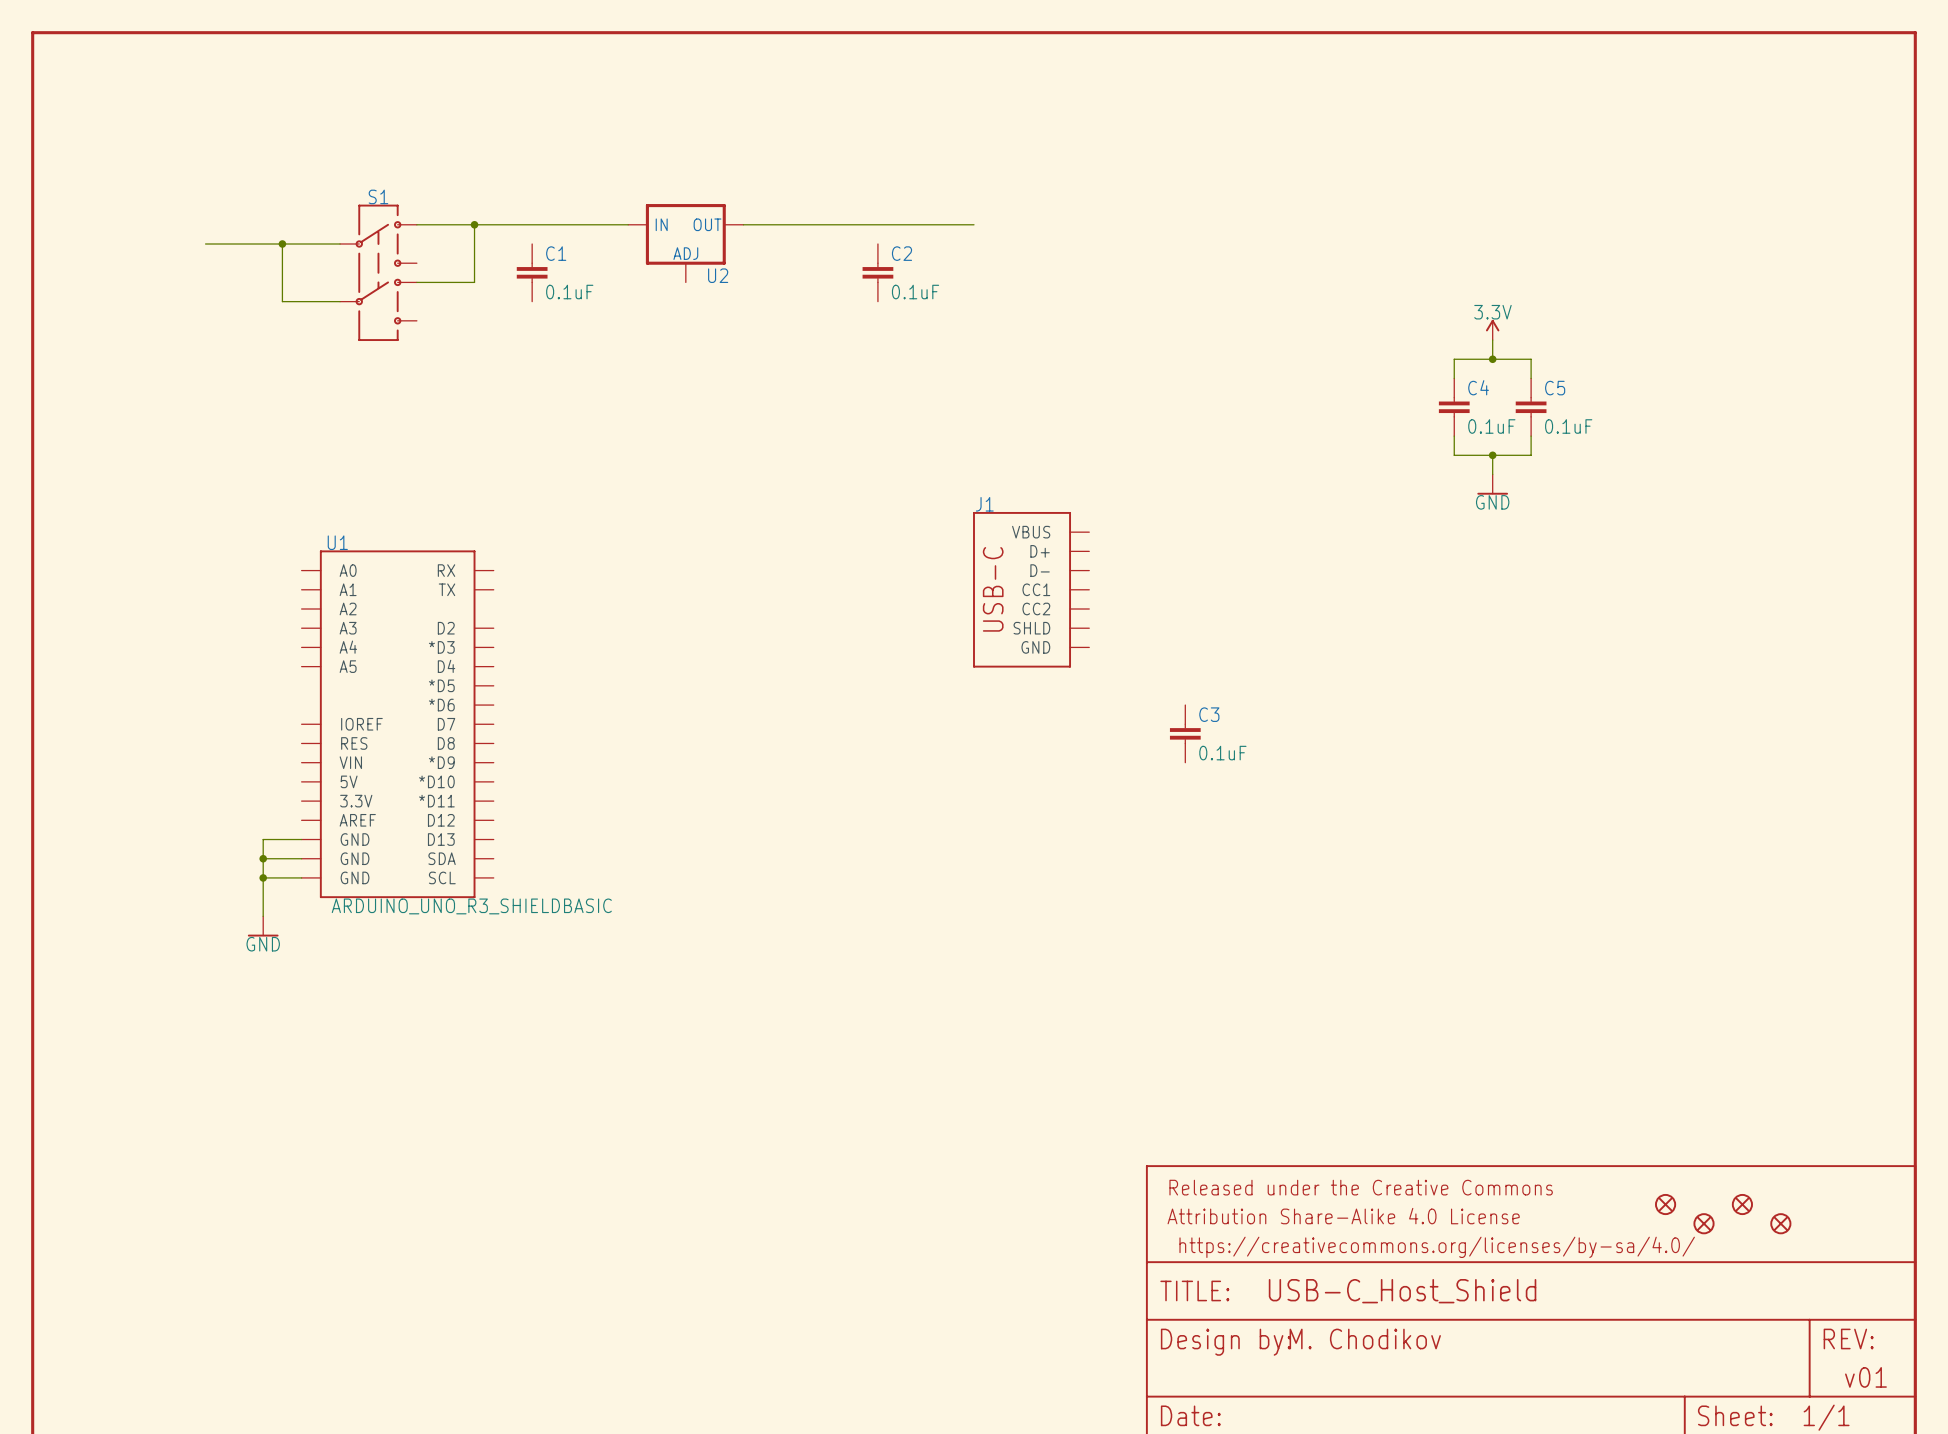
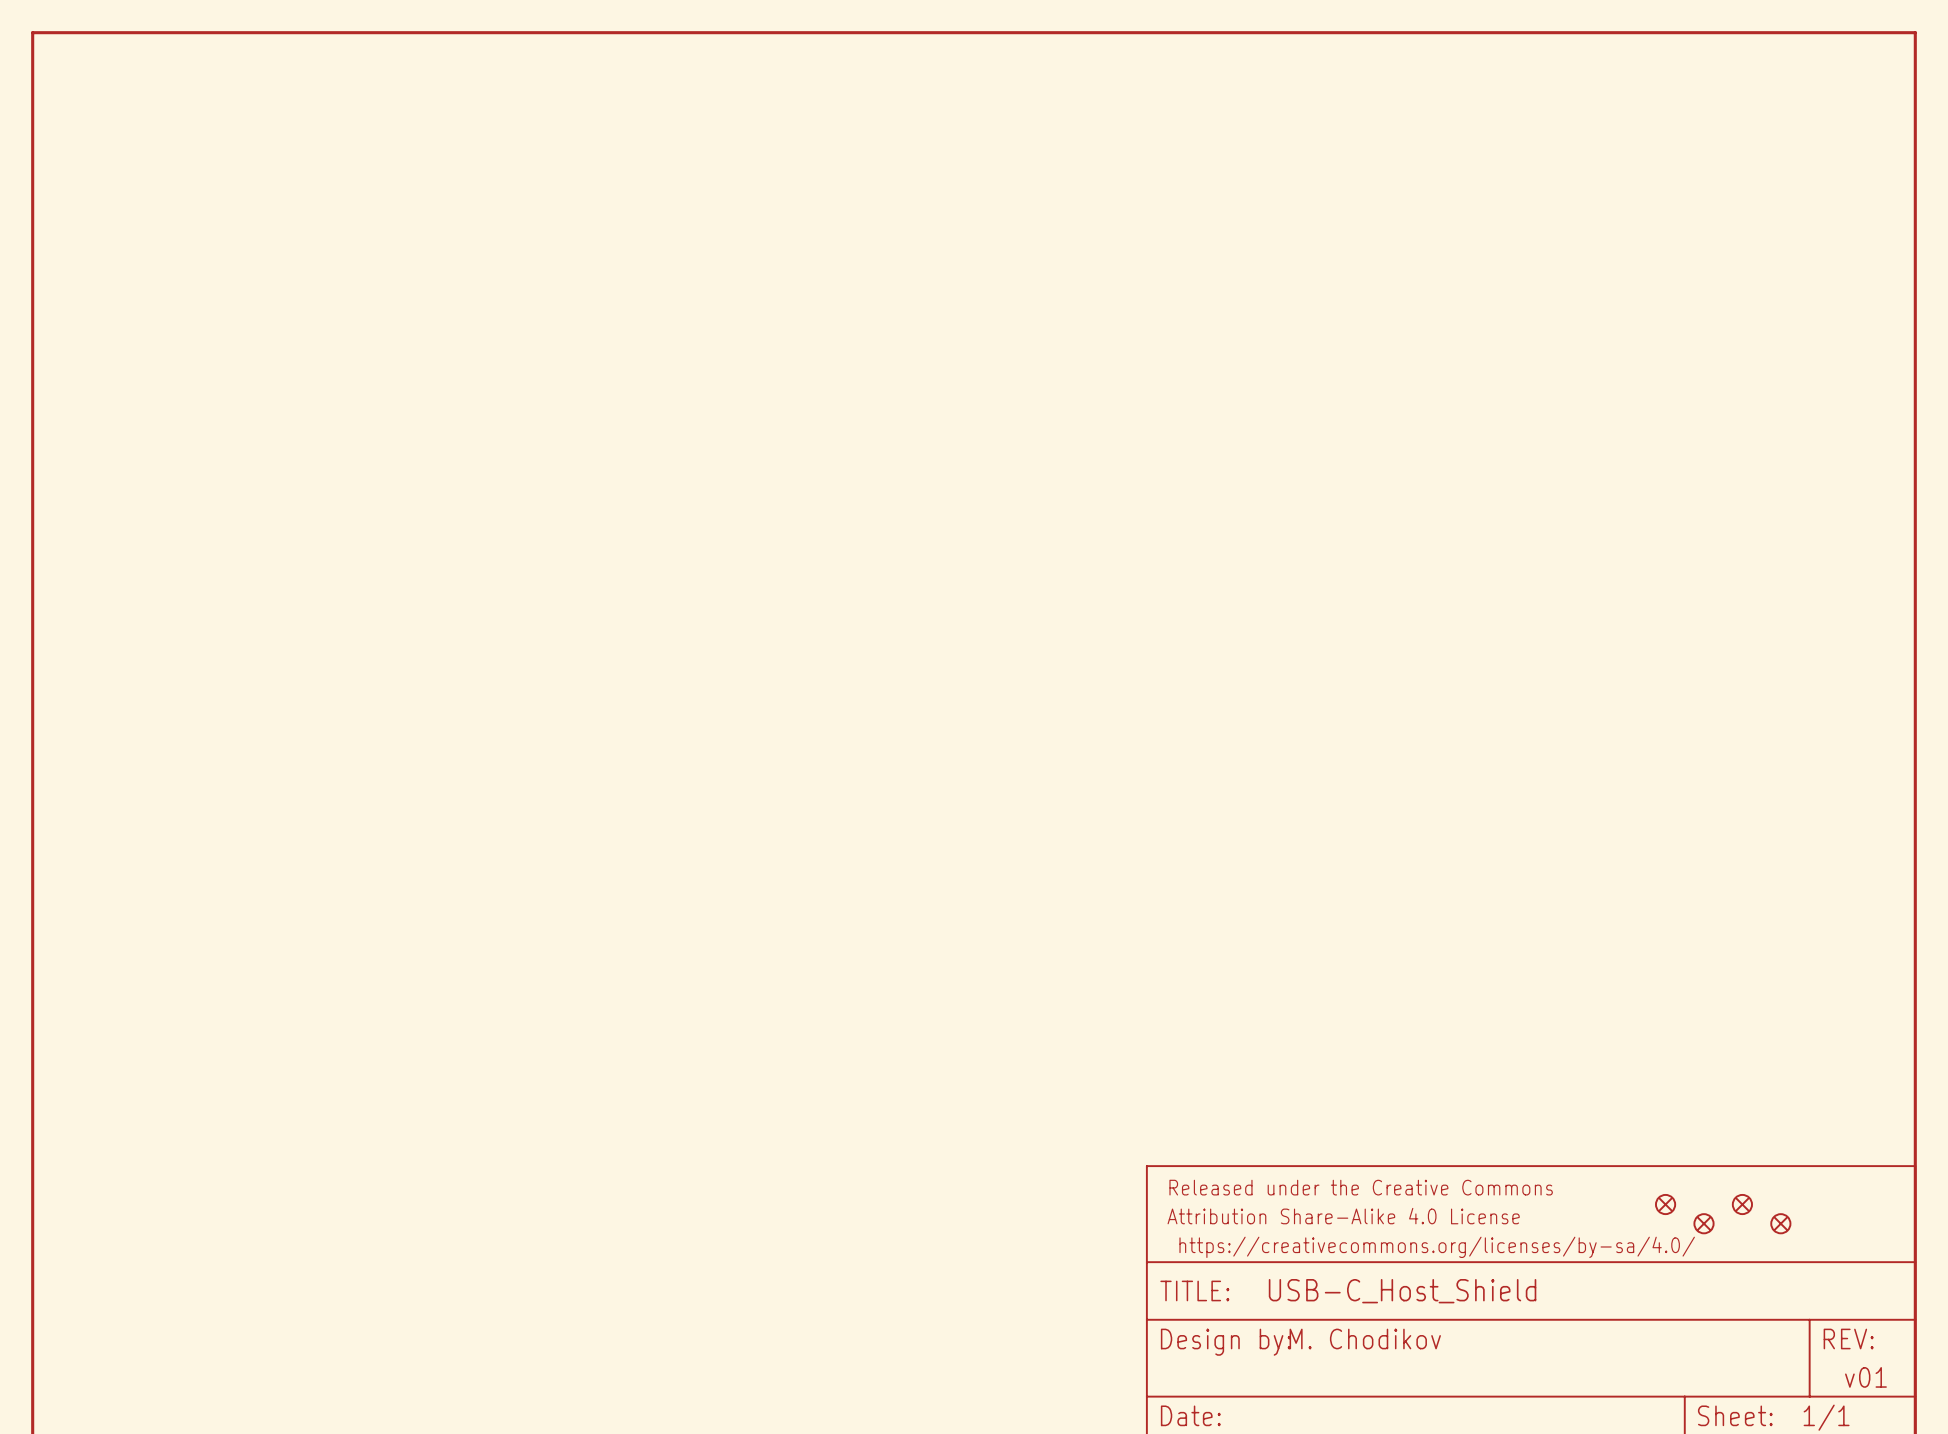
wire: (416, 224) (628, 224) -> none
wire: (474, 224) (474, 282) (416, 282) -> none
junction: (474, 224) -> none
wire: (743, 224) (973, 224) -> none
wire: (205, 243) (340, 243) -> none
wire: (282, 243) (282, 301) (340, 301) -> none
junction: (282, 243) -> none
U2: (685, 243) -> none
S1: (378, 272) -> none
C1: 0.1uF (532, 272) -> none
C2: 0.1uF (877, 272) -> none
power symbol: 3.3V (1492, 329) -> none
wire: (1492, 340) (1492, 359) -> none
junction: (1492, 359) -> none
wire: (1454, 378) (1454, 359) (1531, 359) (1531, 378) -> none
C4: 0.1uF (1454, 407) -> none
C5: 0.1uF (1531, 407) -> none
wire: (1454, 436) (1454, 455) (1531, 455) (1531, 436) -> none
wire: (1492, 455) (1492, 474) -> none
junction: (1492, 455) -> none
power symbol: GND (1492, 484) -> none
J1: (1031, 589) -> none
U1: ARDUINO_UNO_R3_SHIELDBASIC (397, 724) -> none
C3: 0.1uF (1185, 733) -> none
wire: (301, 839) (263, 839) (263, 916) -> none
wire: (263, 858) (301, 858) -> none
junction: (263, 858) -> none
wire: (263, 877) (301, 877) -> none
junction: (263, 877) -> none
power symbol: GND (263, 926) -> none

